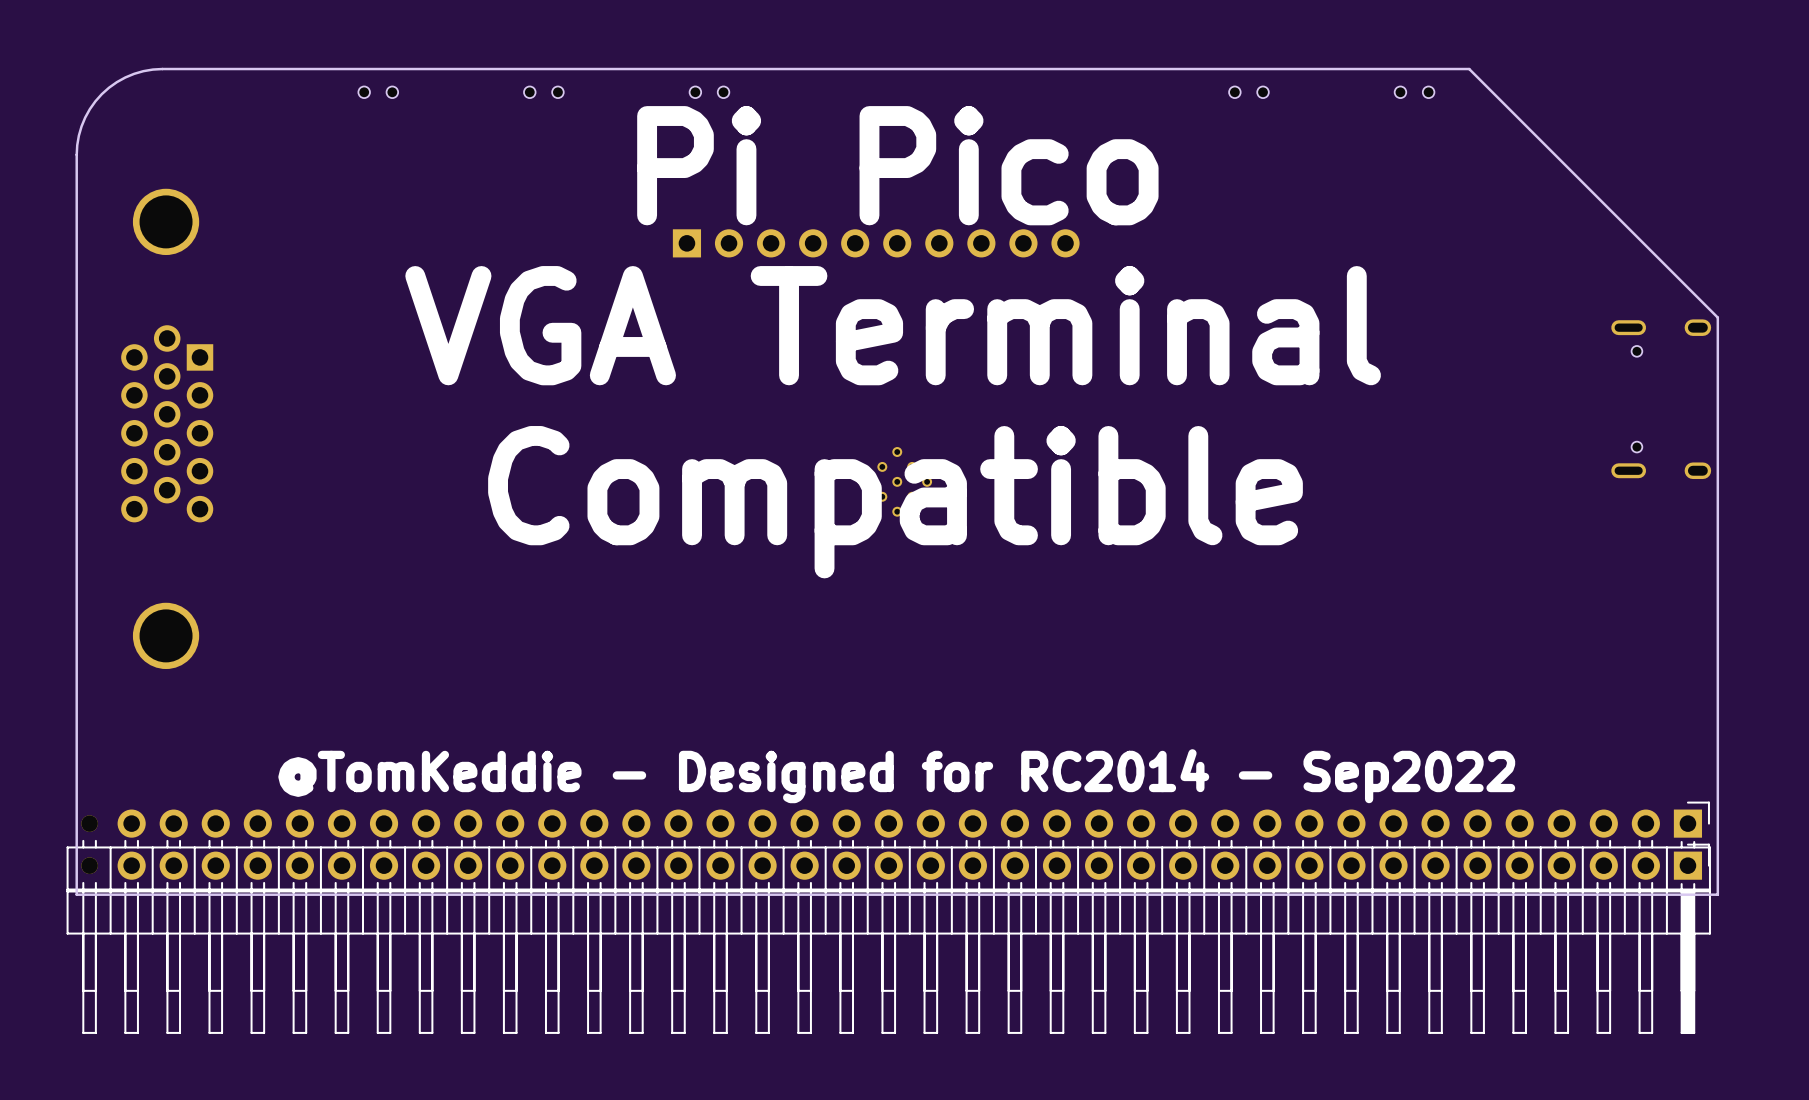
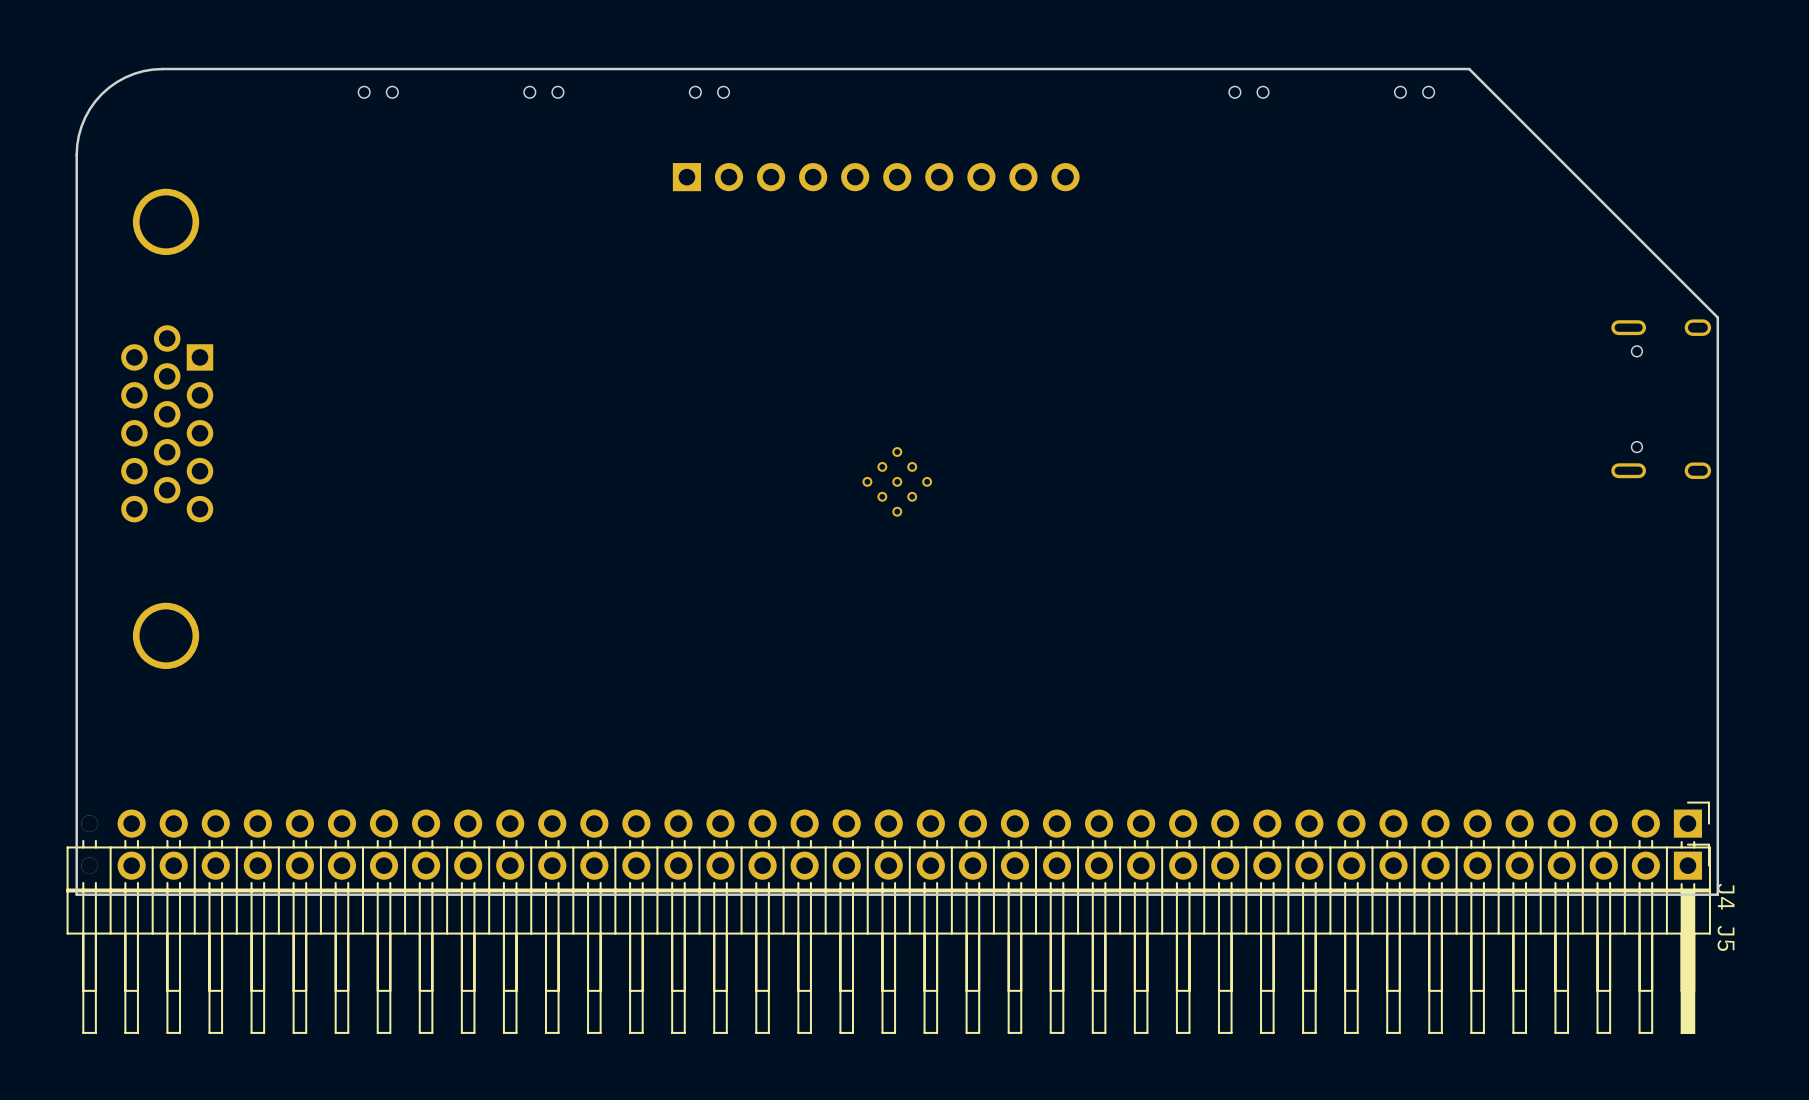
text: Pi Pico (897, 165) -> none
part position: (876, 243) -> (876, 177)
text: VGA Terminal (893, 325) -> none
text: Compatible (895, 502) -> none
text: @TomKeddie - Designed for RC2014 - Sep2022 (896, 776) -> none
J4 name: none -> J4 (1726, 896)
J5 name: none -> J5 (1726, 938)

